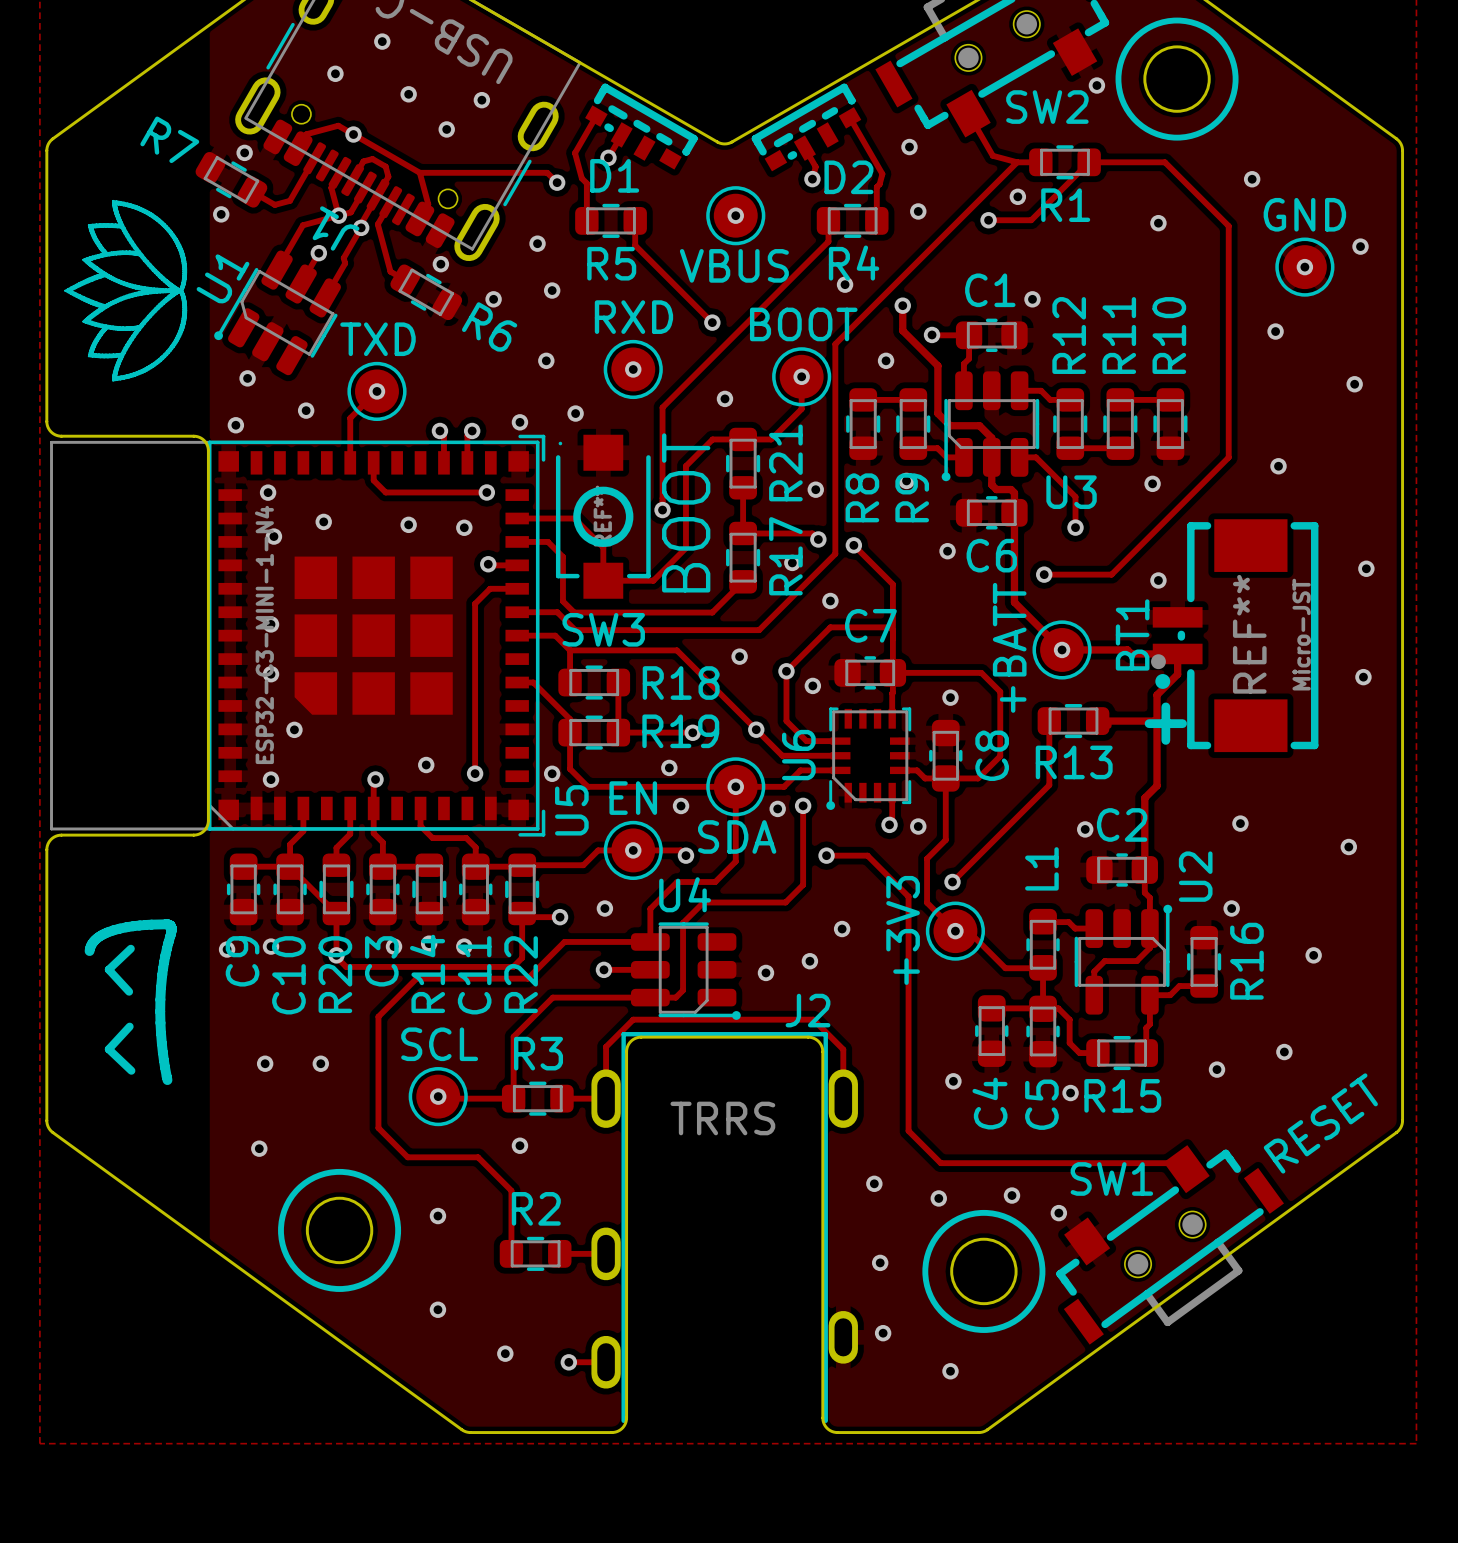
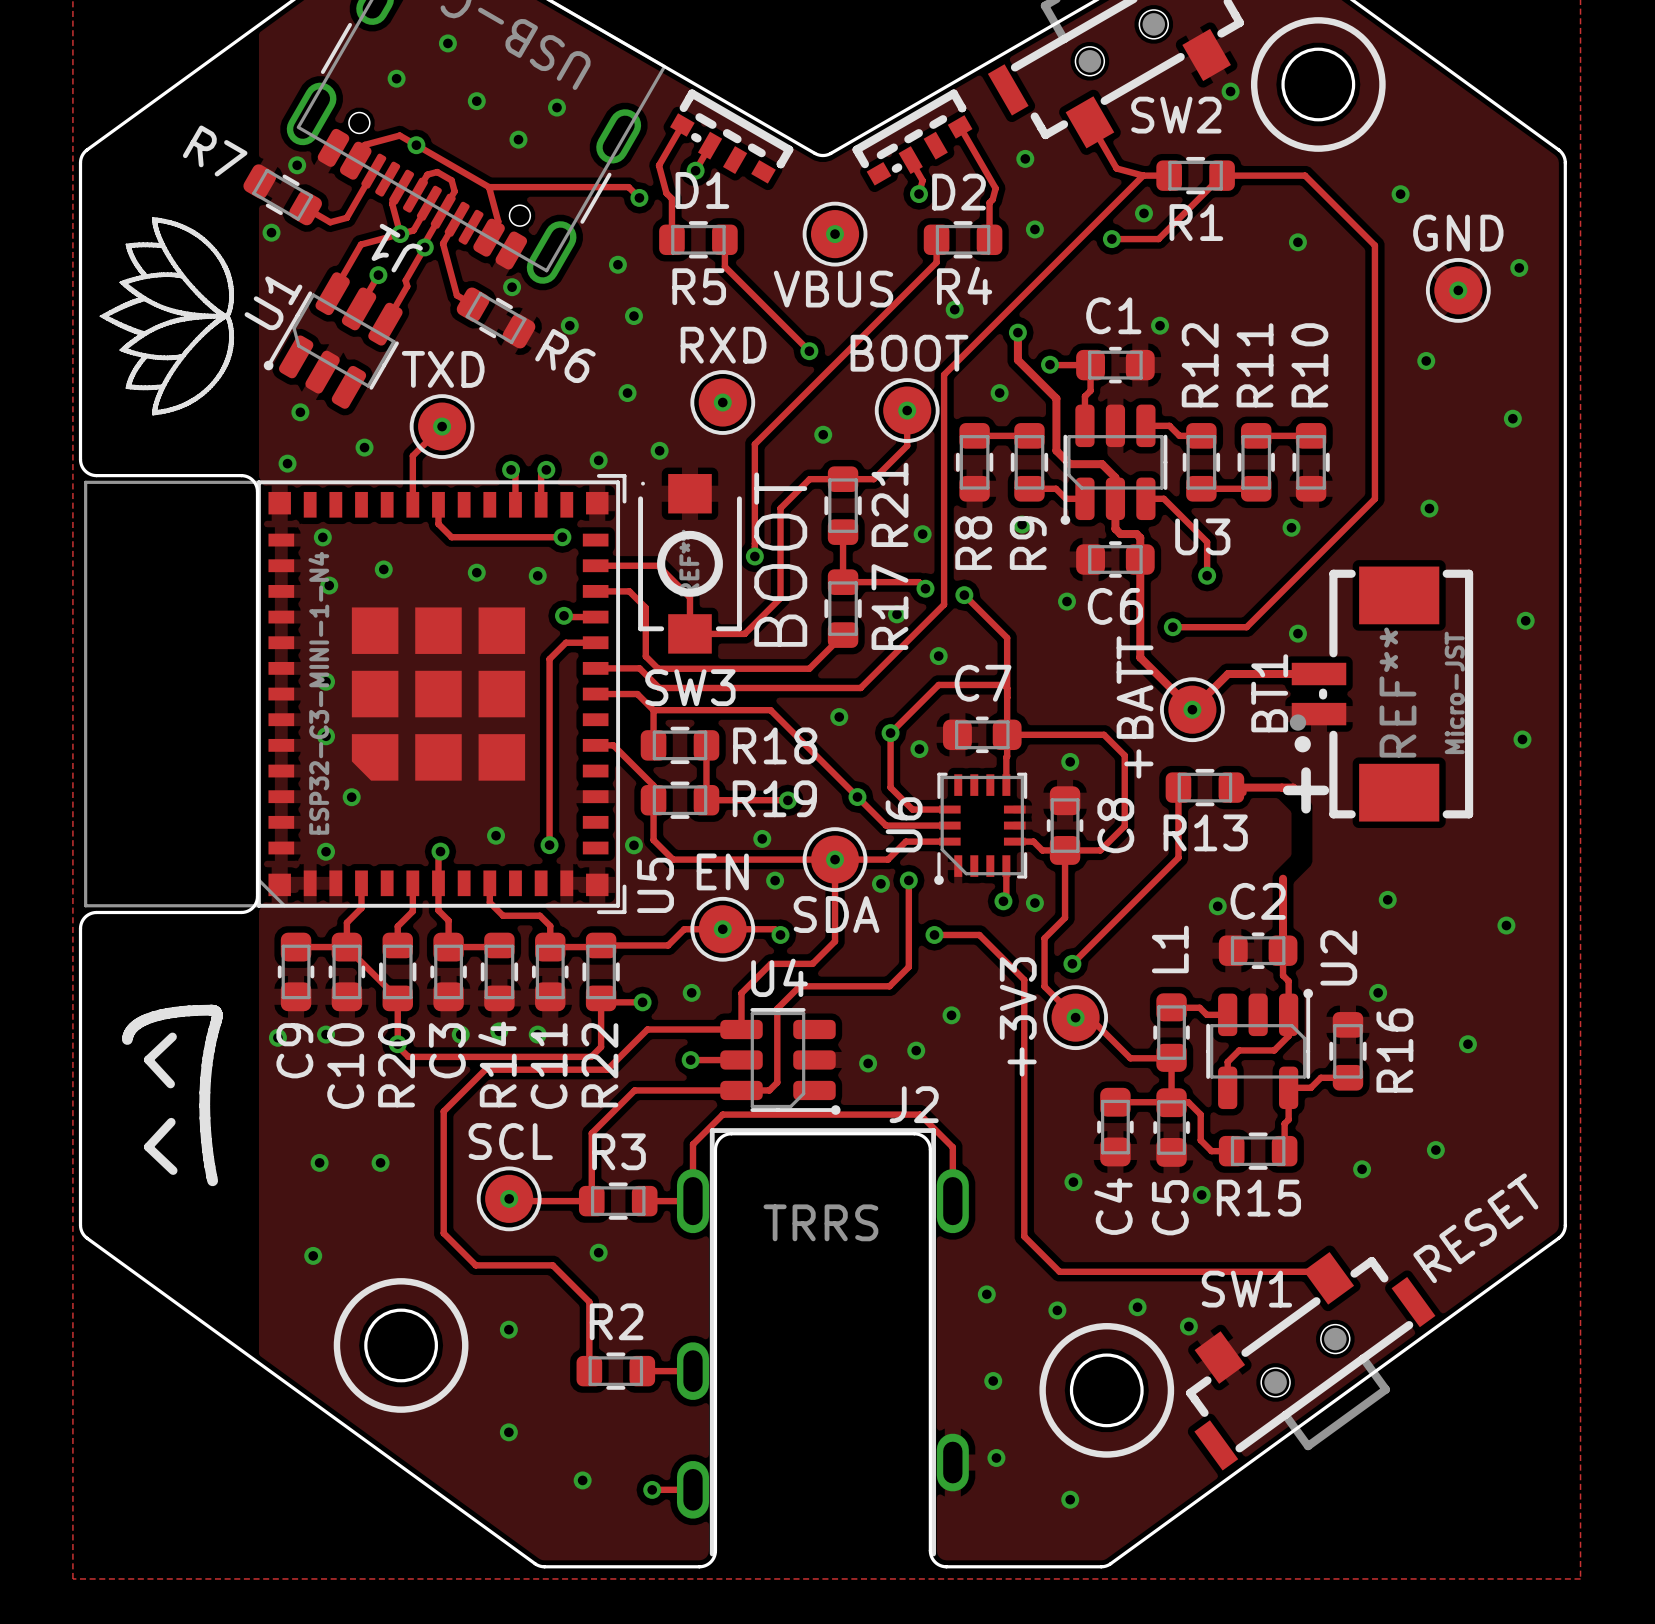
track: (1062, 649) (1127, 649) (1131, 653) (1177, 653) (1177, 674) (1157, 695) (1157, 785) (1144, 798) (1144, 804) -> (1192, 709) (1228, 674) (1319, 674)

